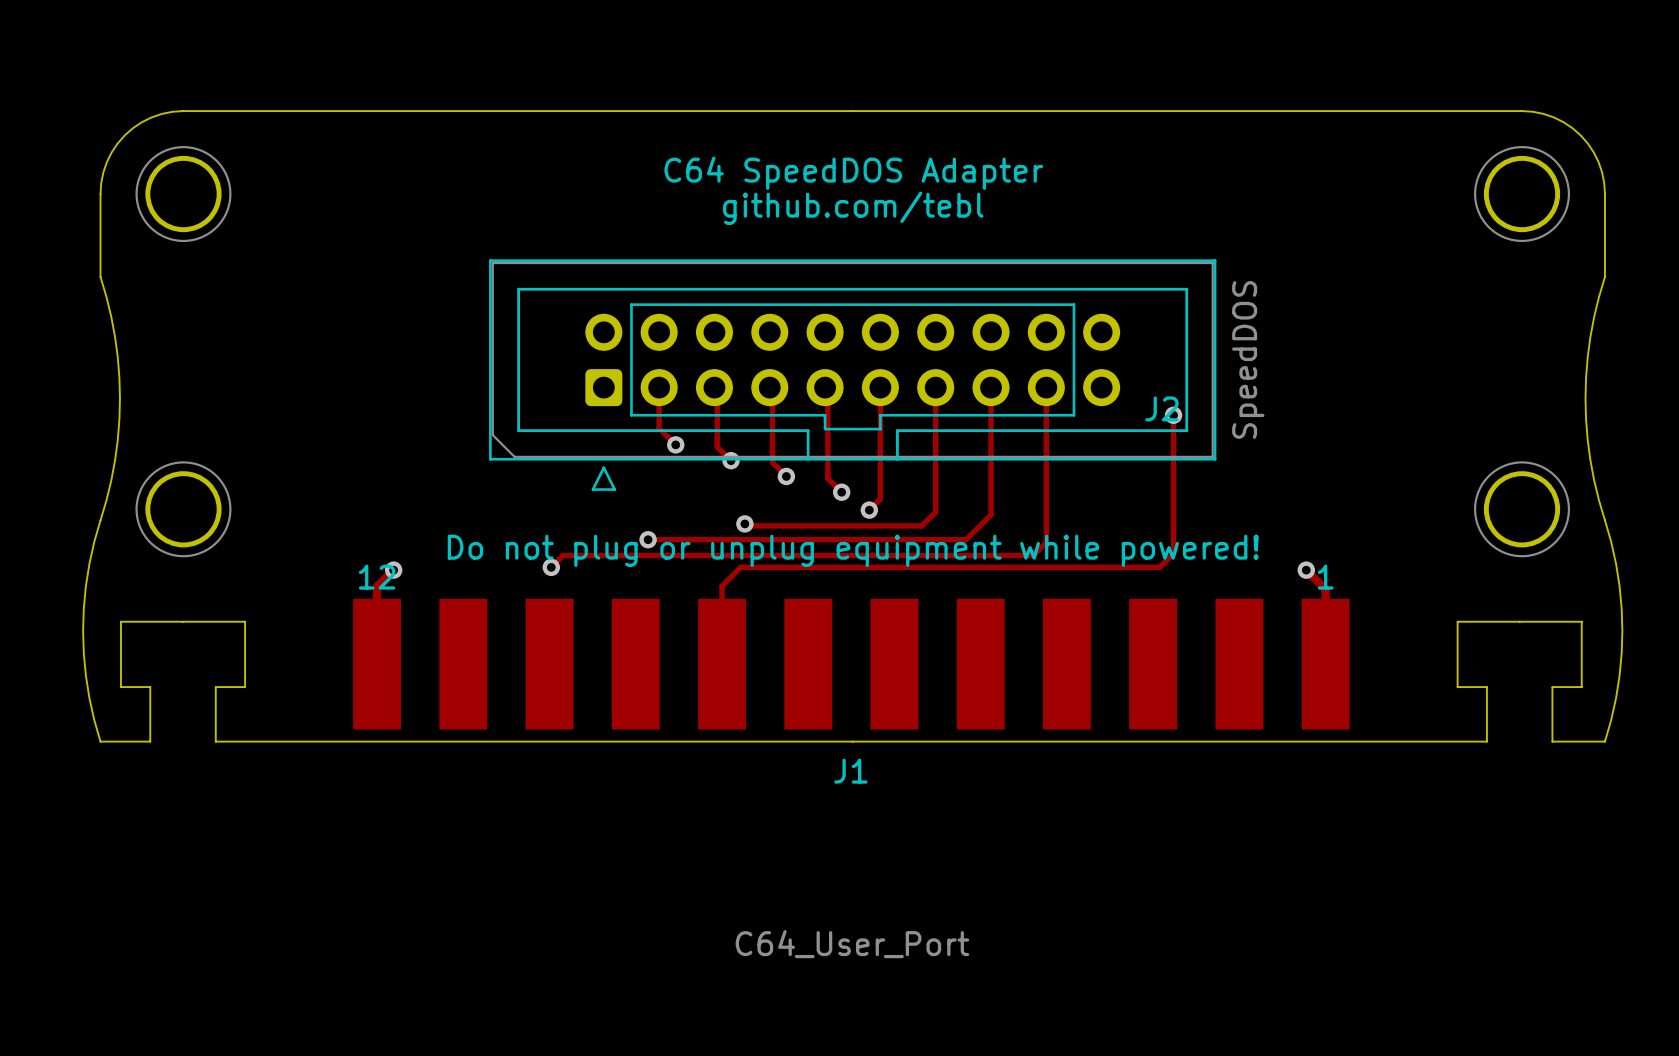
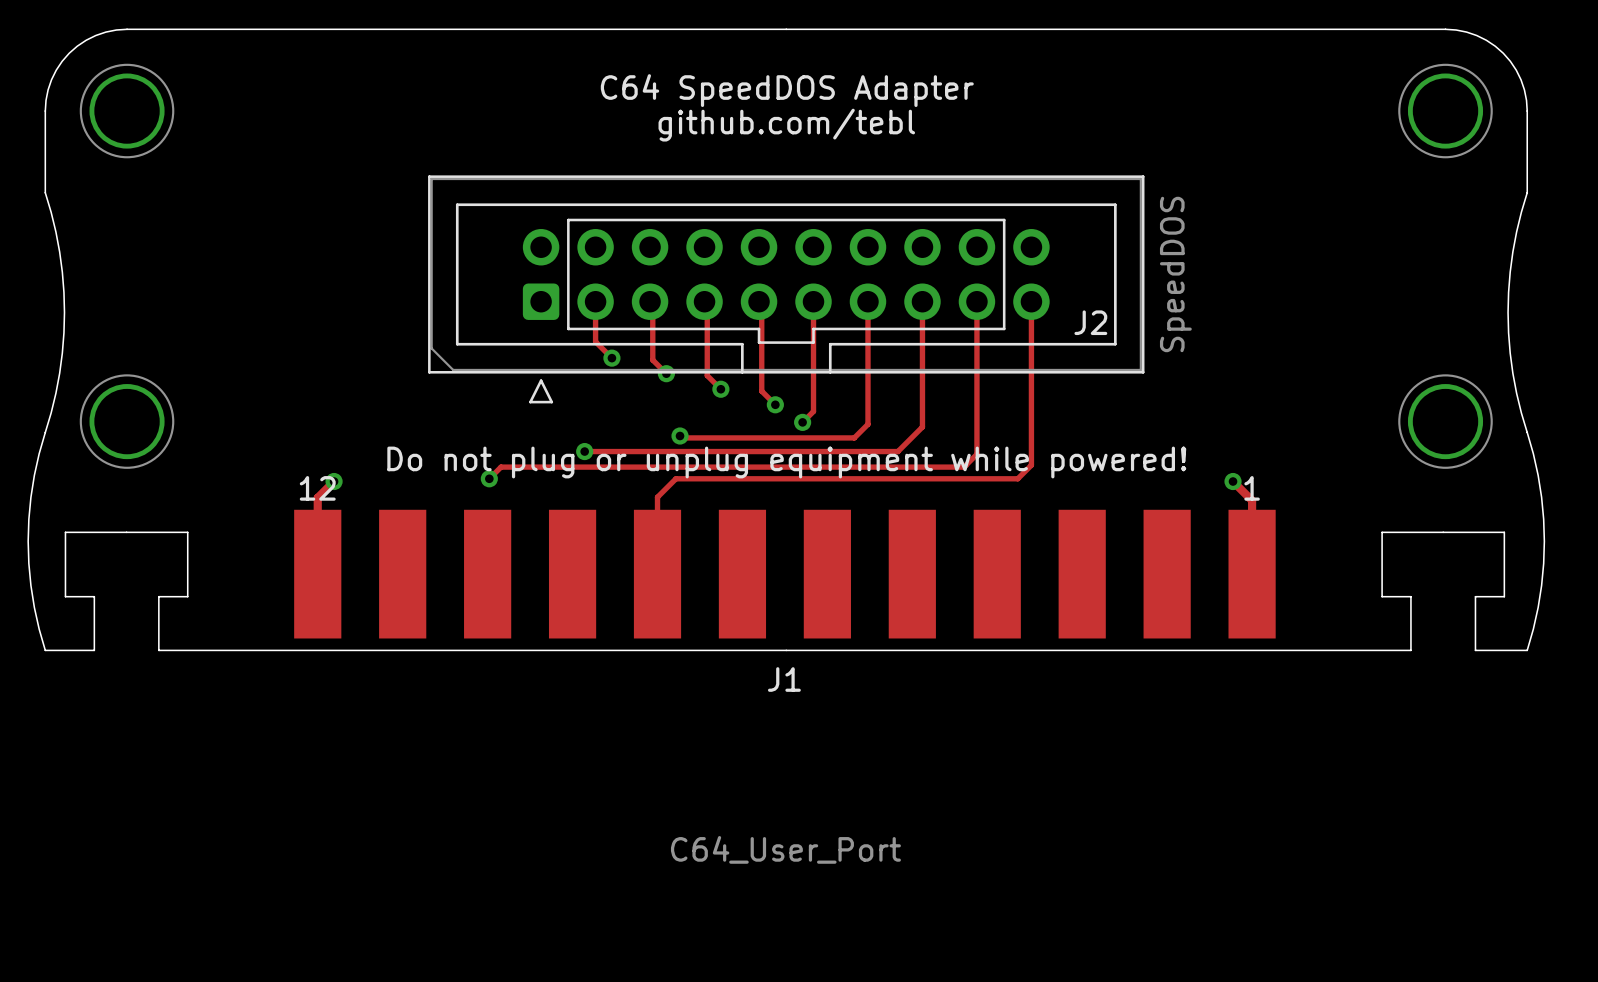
track: (1173, 415) (1173, 553) (1159, 567) (1087, 567) -> (1031, 301) (1031, 465) (1017, 478)
via: (1173, 415) -> none

